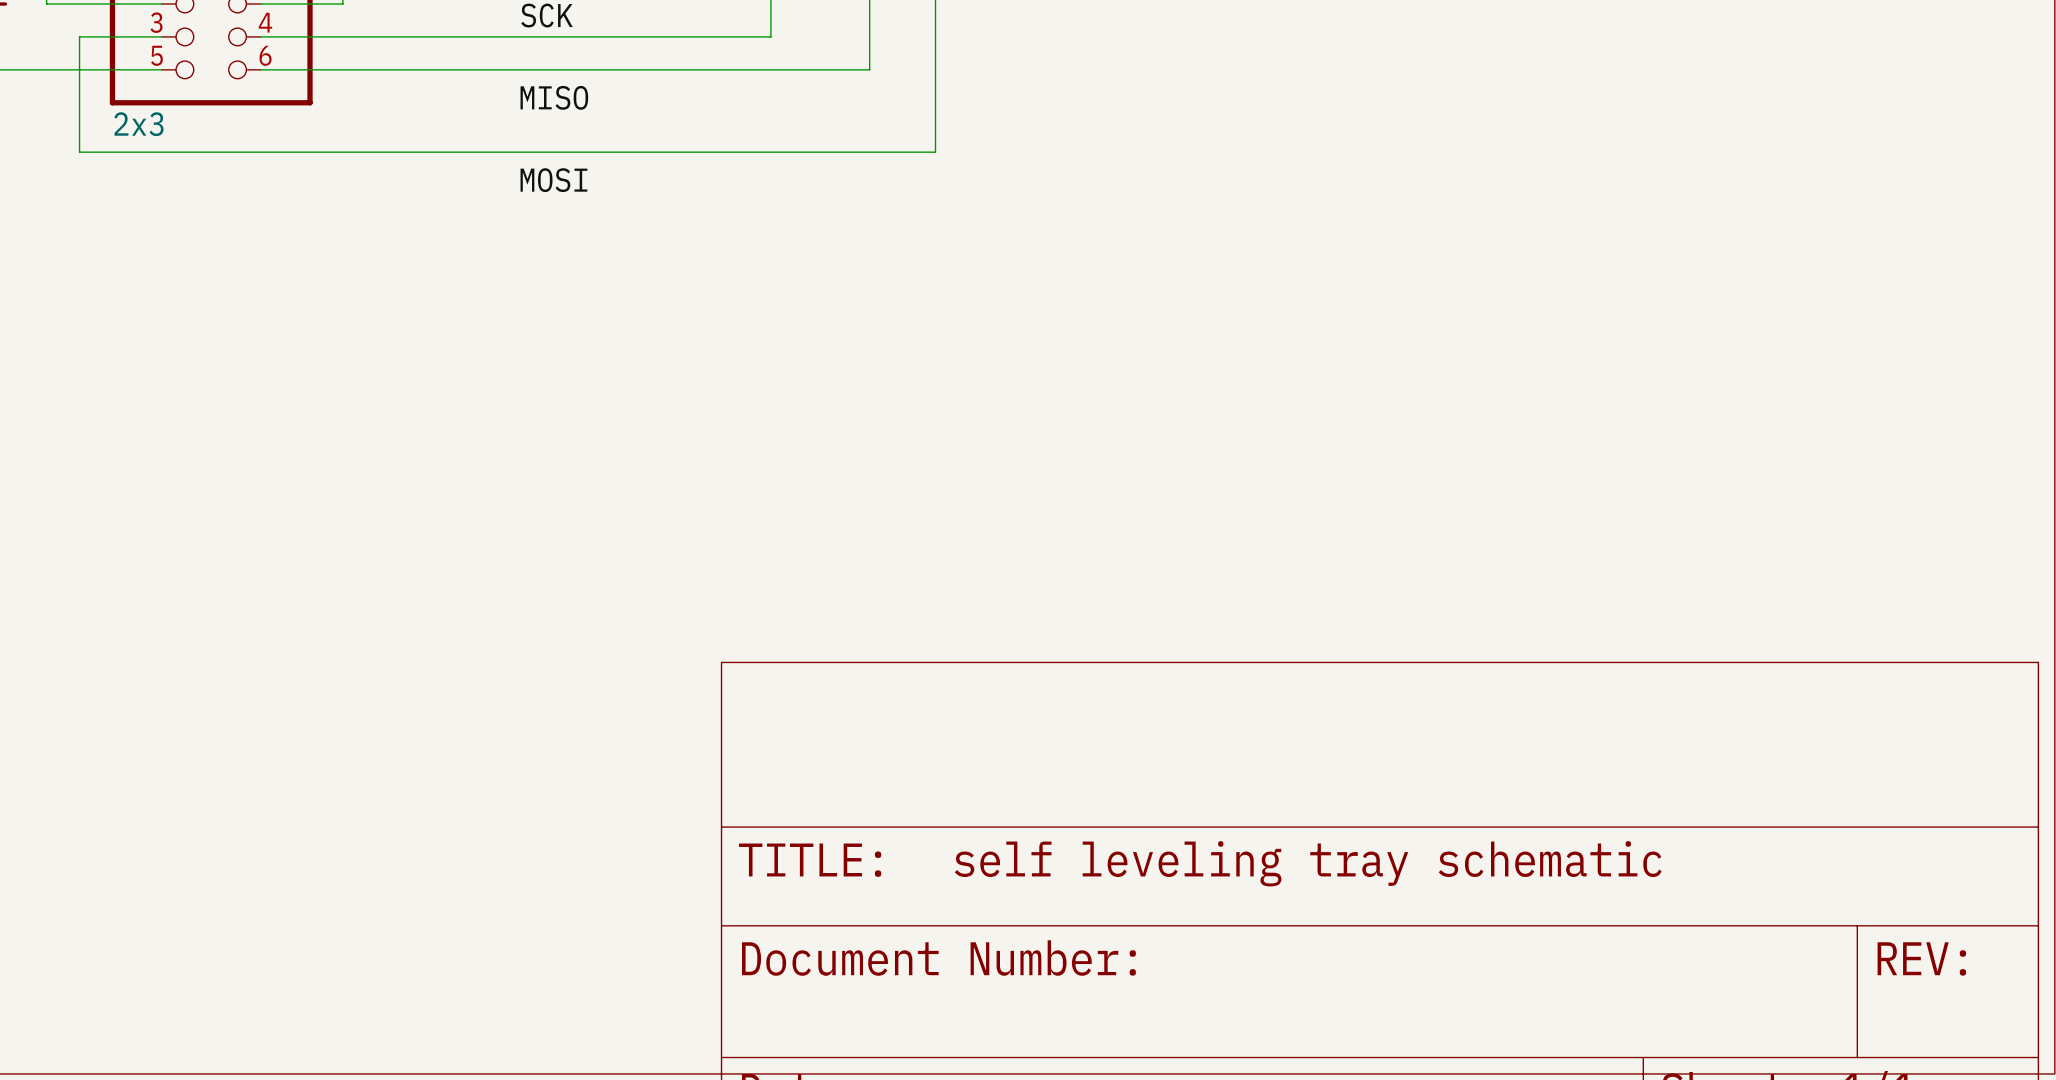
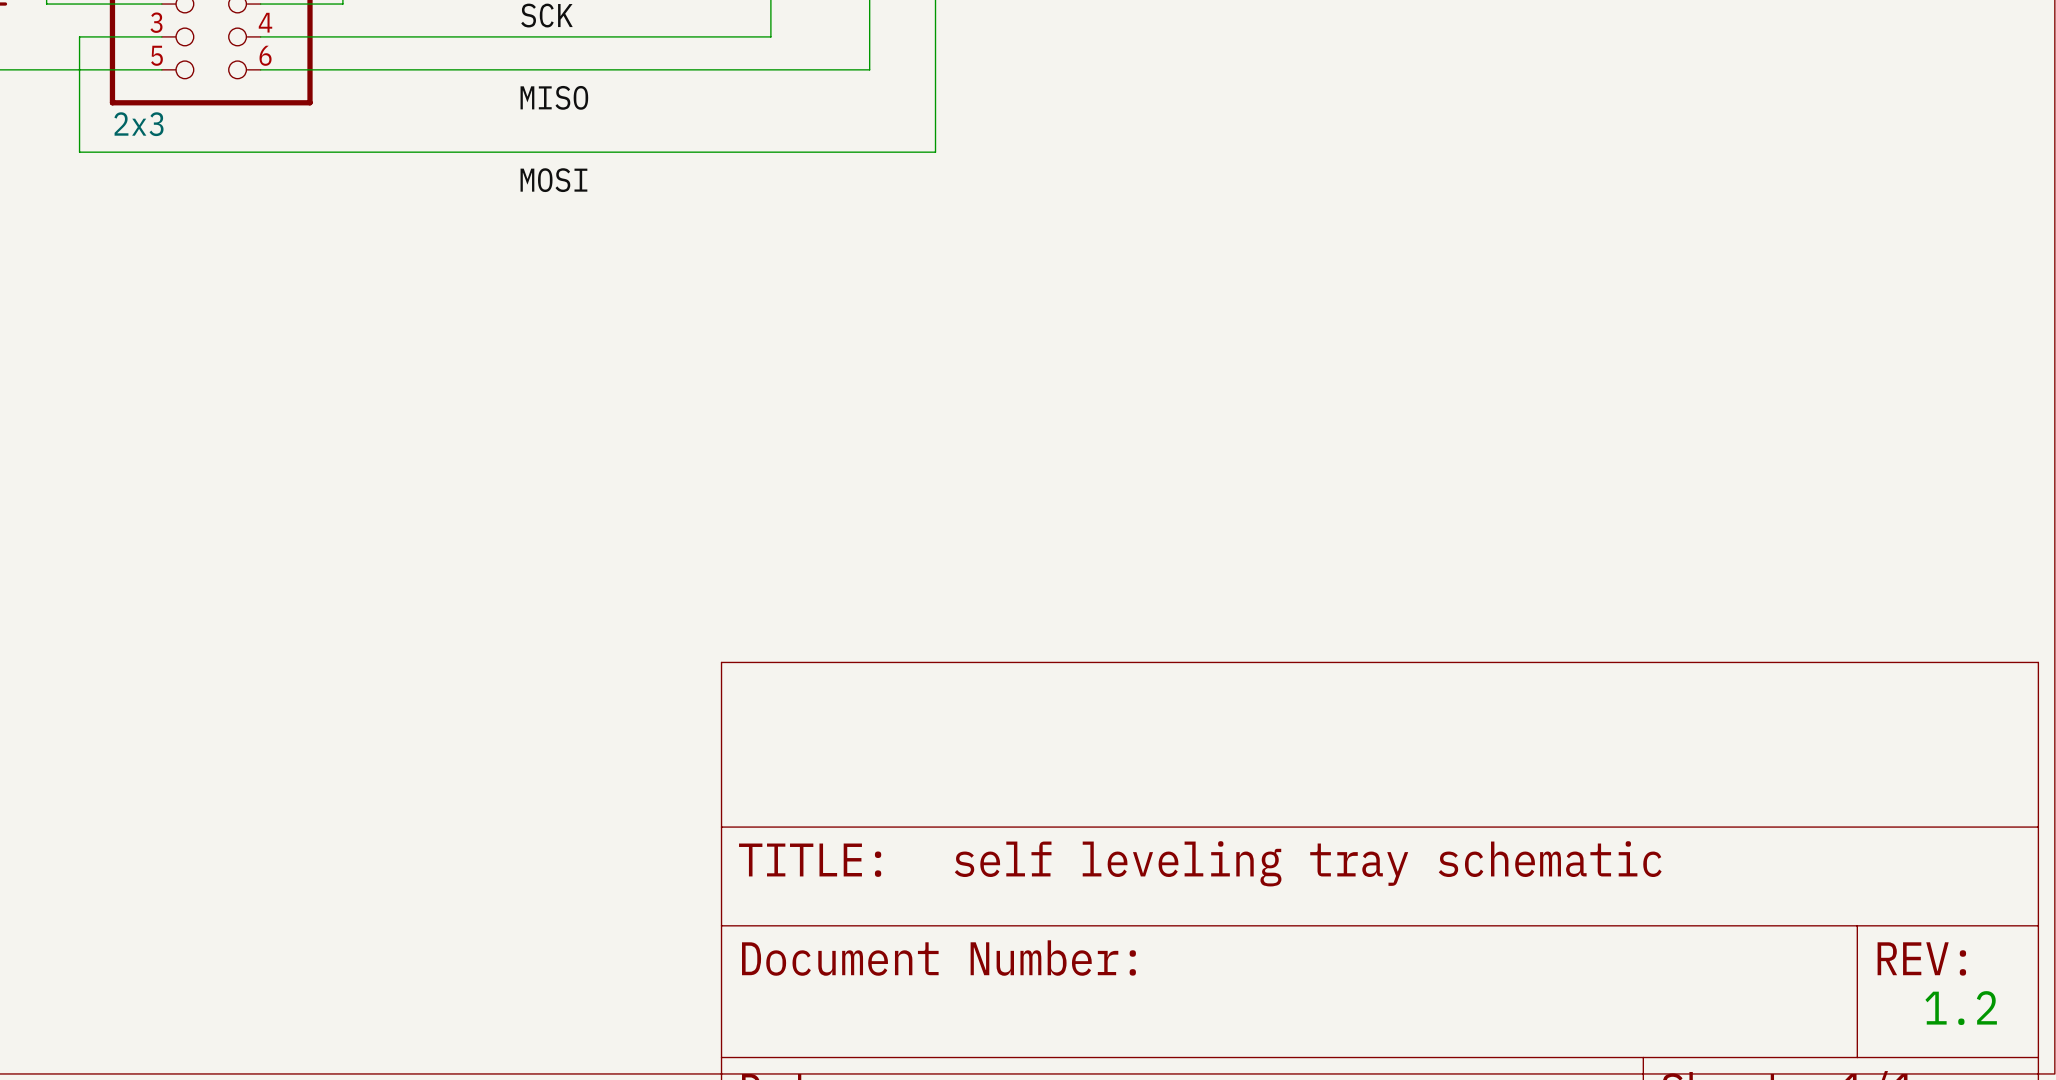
text: none -> 1.2 (1961, 1008)

